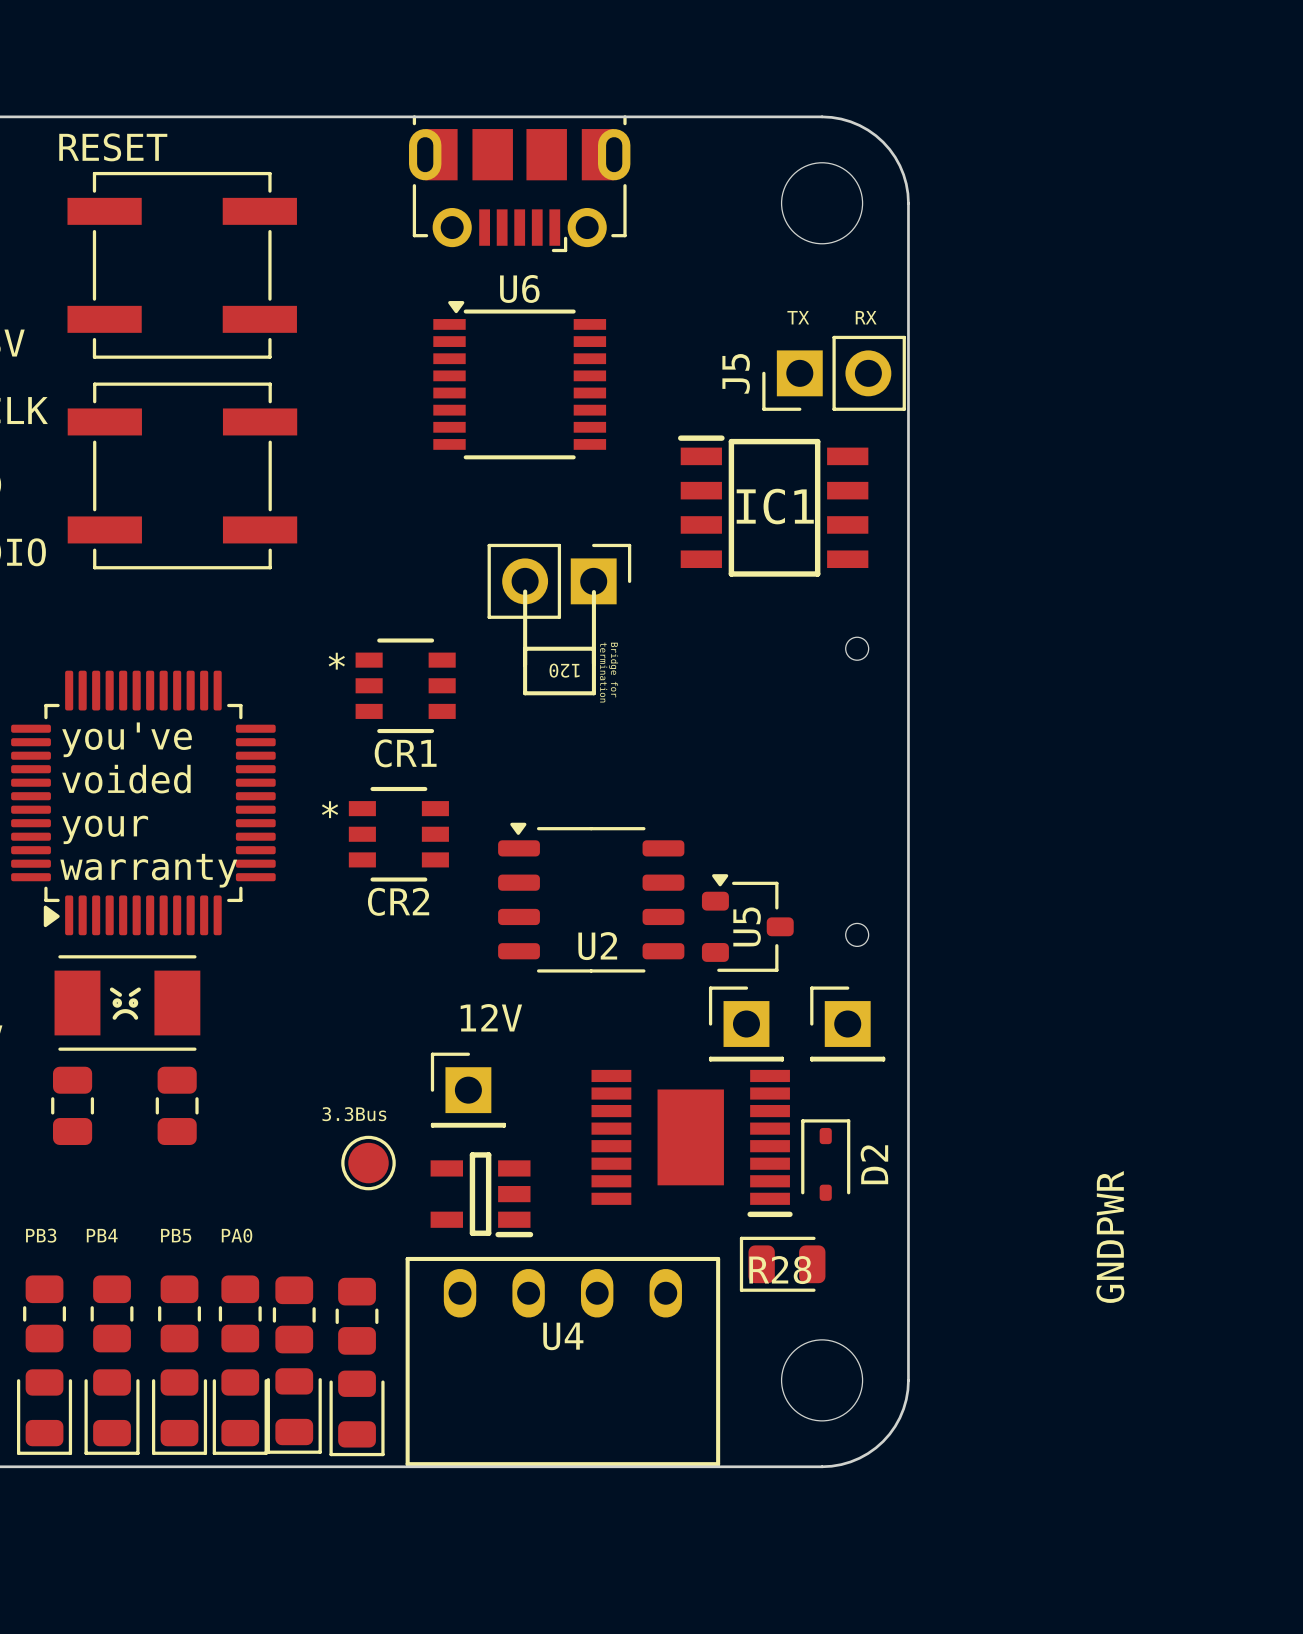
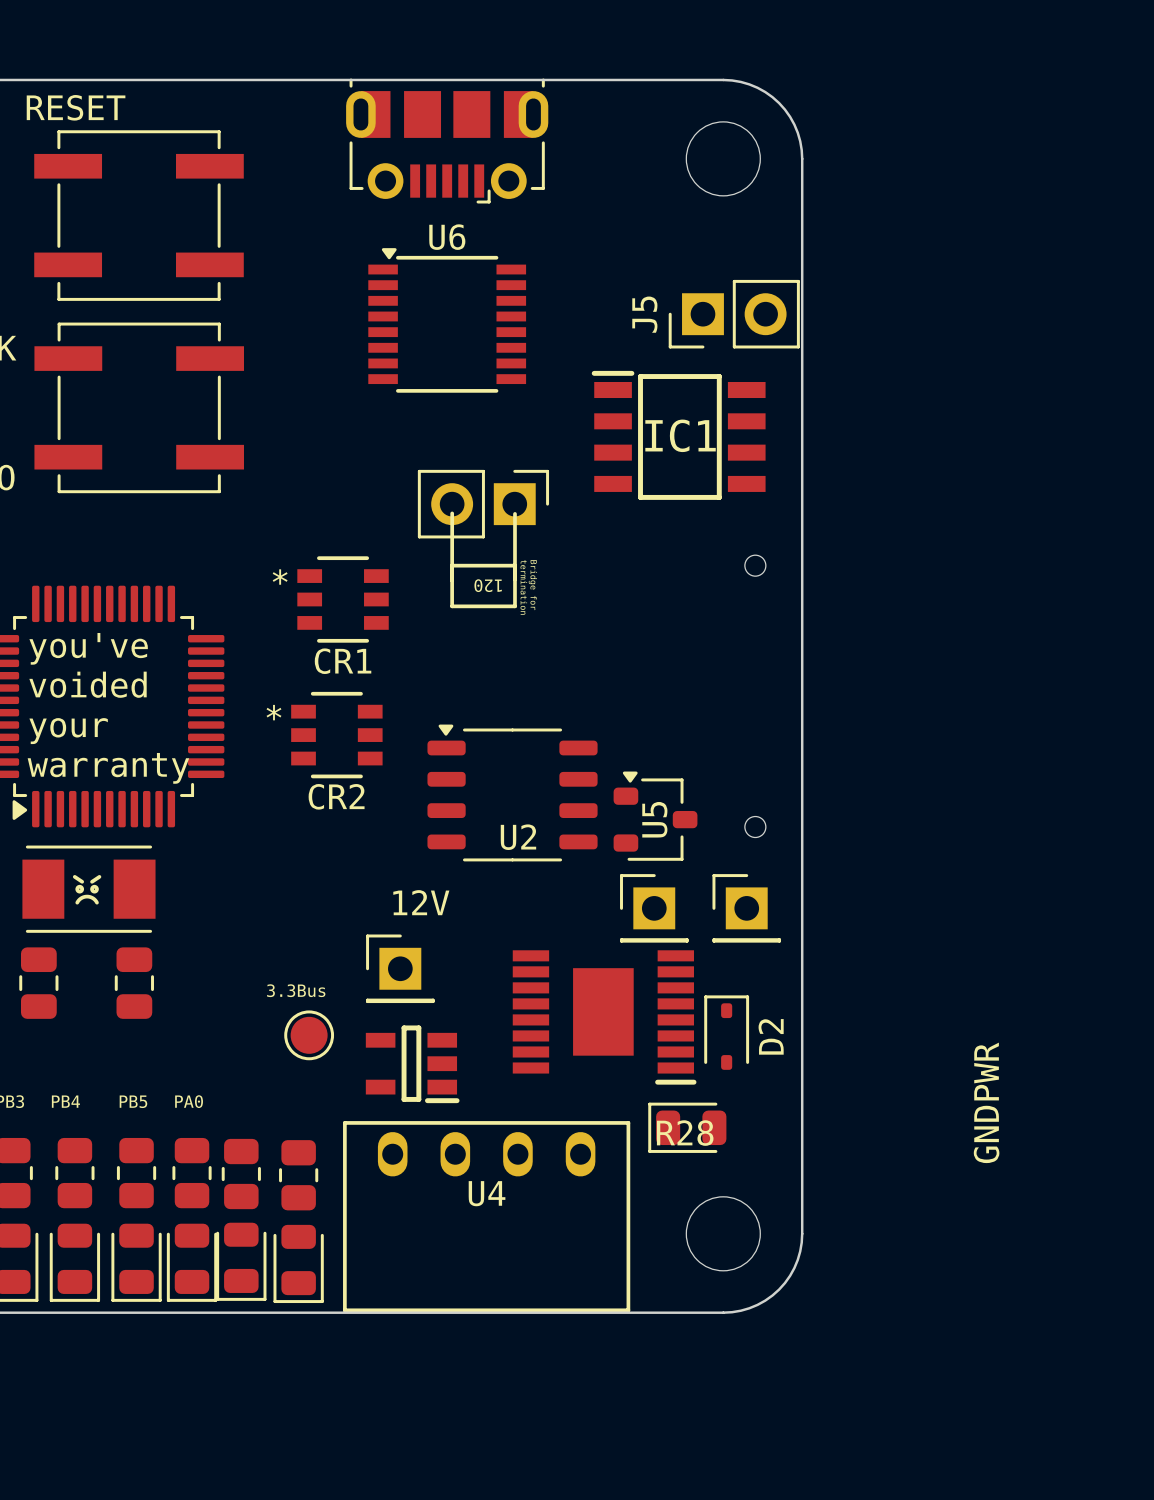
text: TX (798, 317) -> none
text: RX (866, 317) -> none

